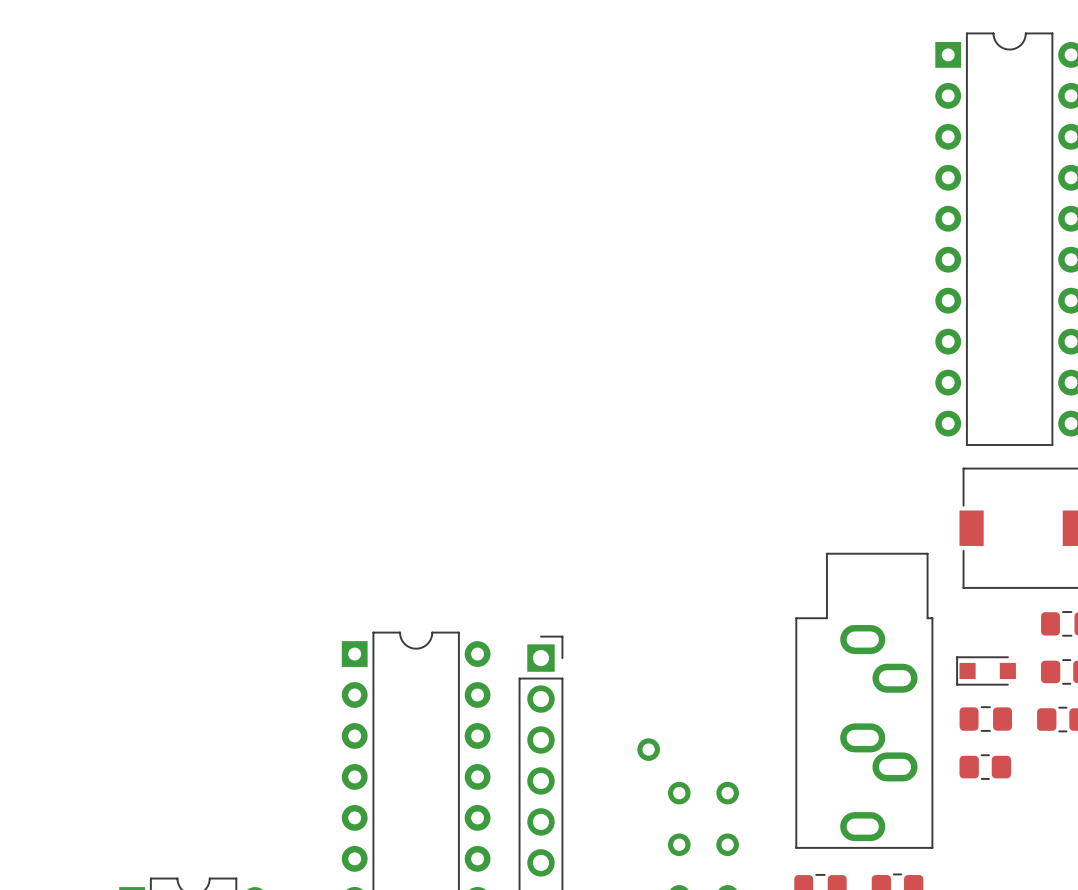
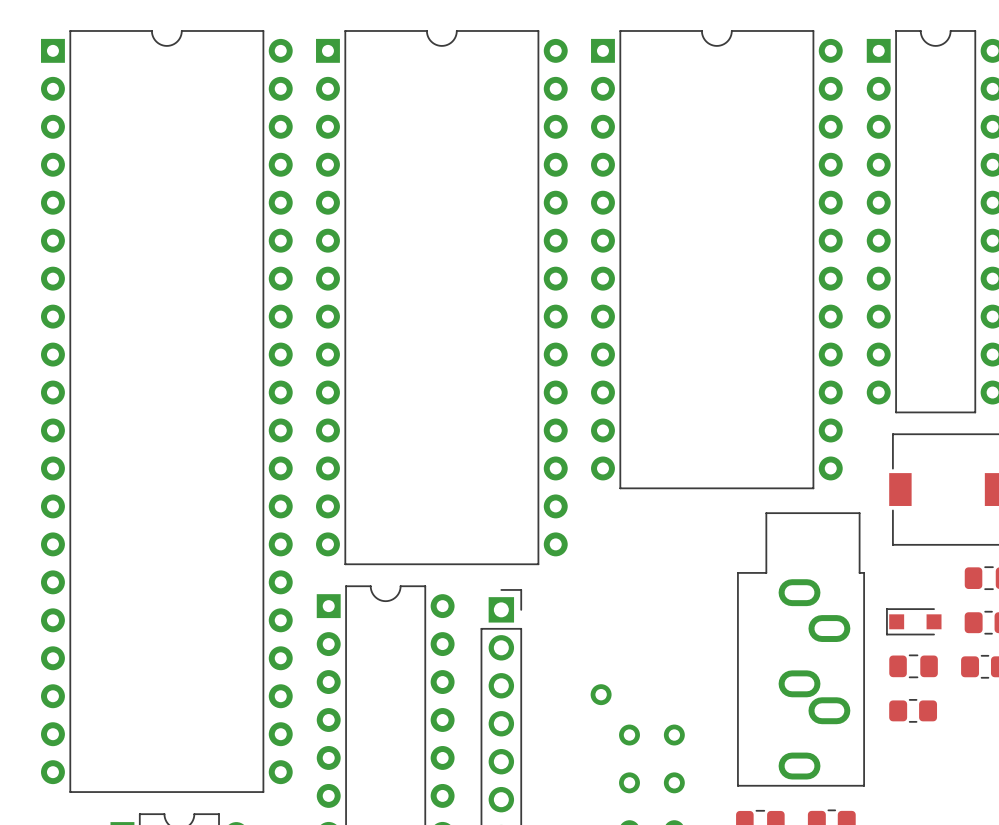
part: none -> (716, 259)
part: none -> (441, 297)
part: none -> (166, 411)

